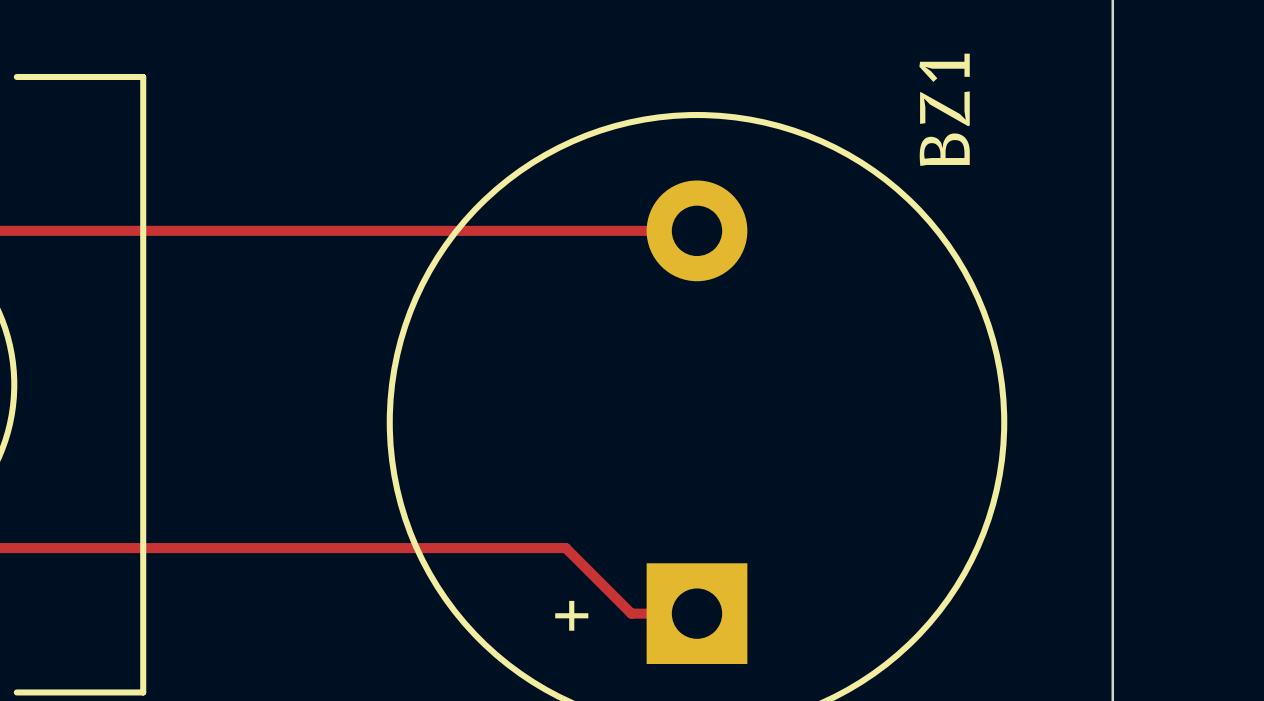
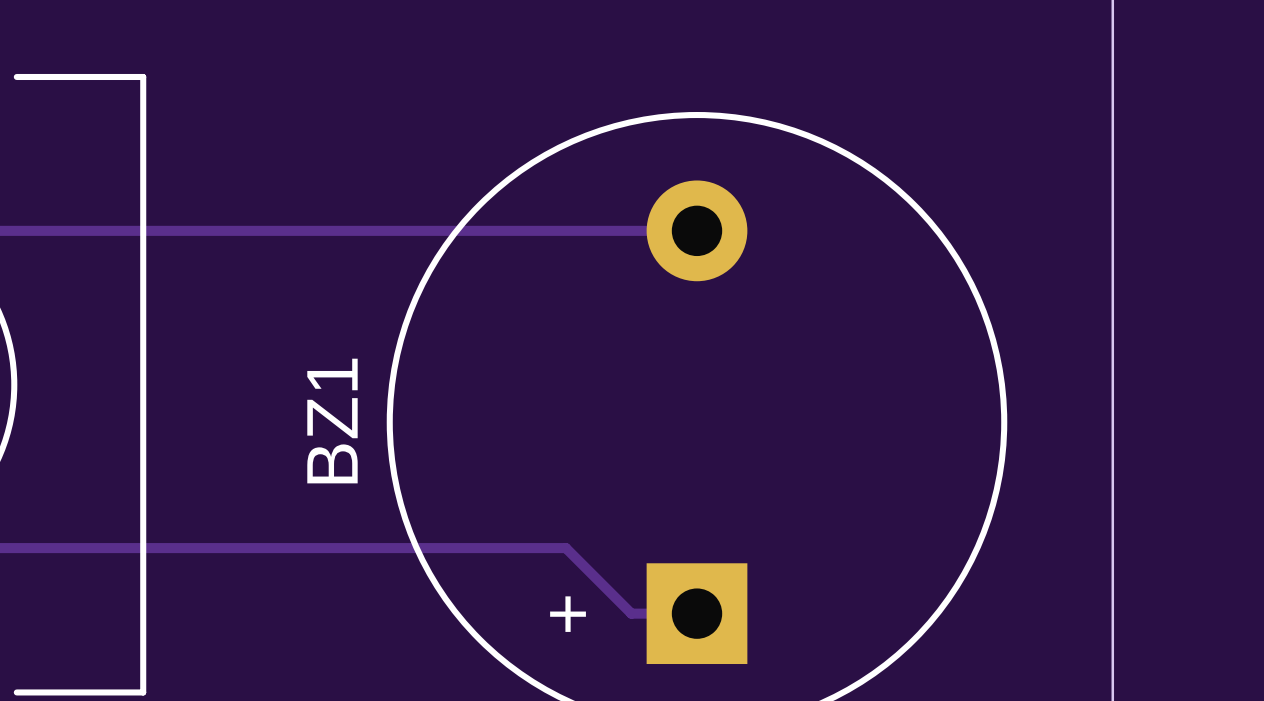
BZ1 name position: BZ1 (944, 109) -> BZ1 (332, 421)

